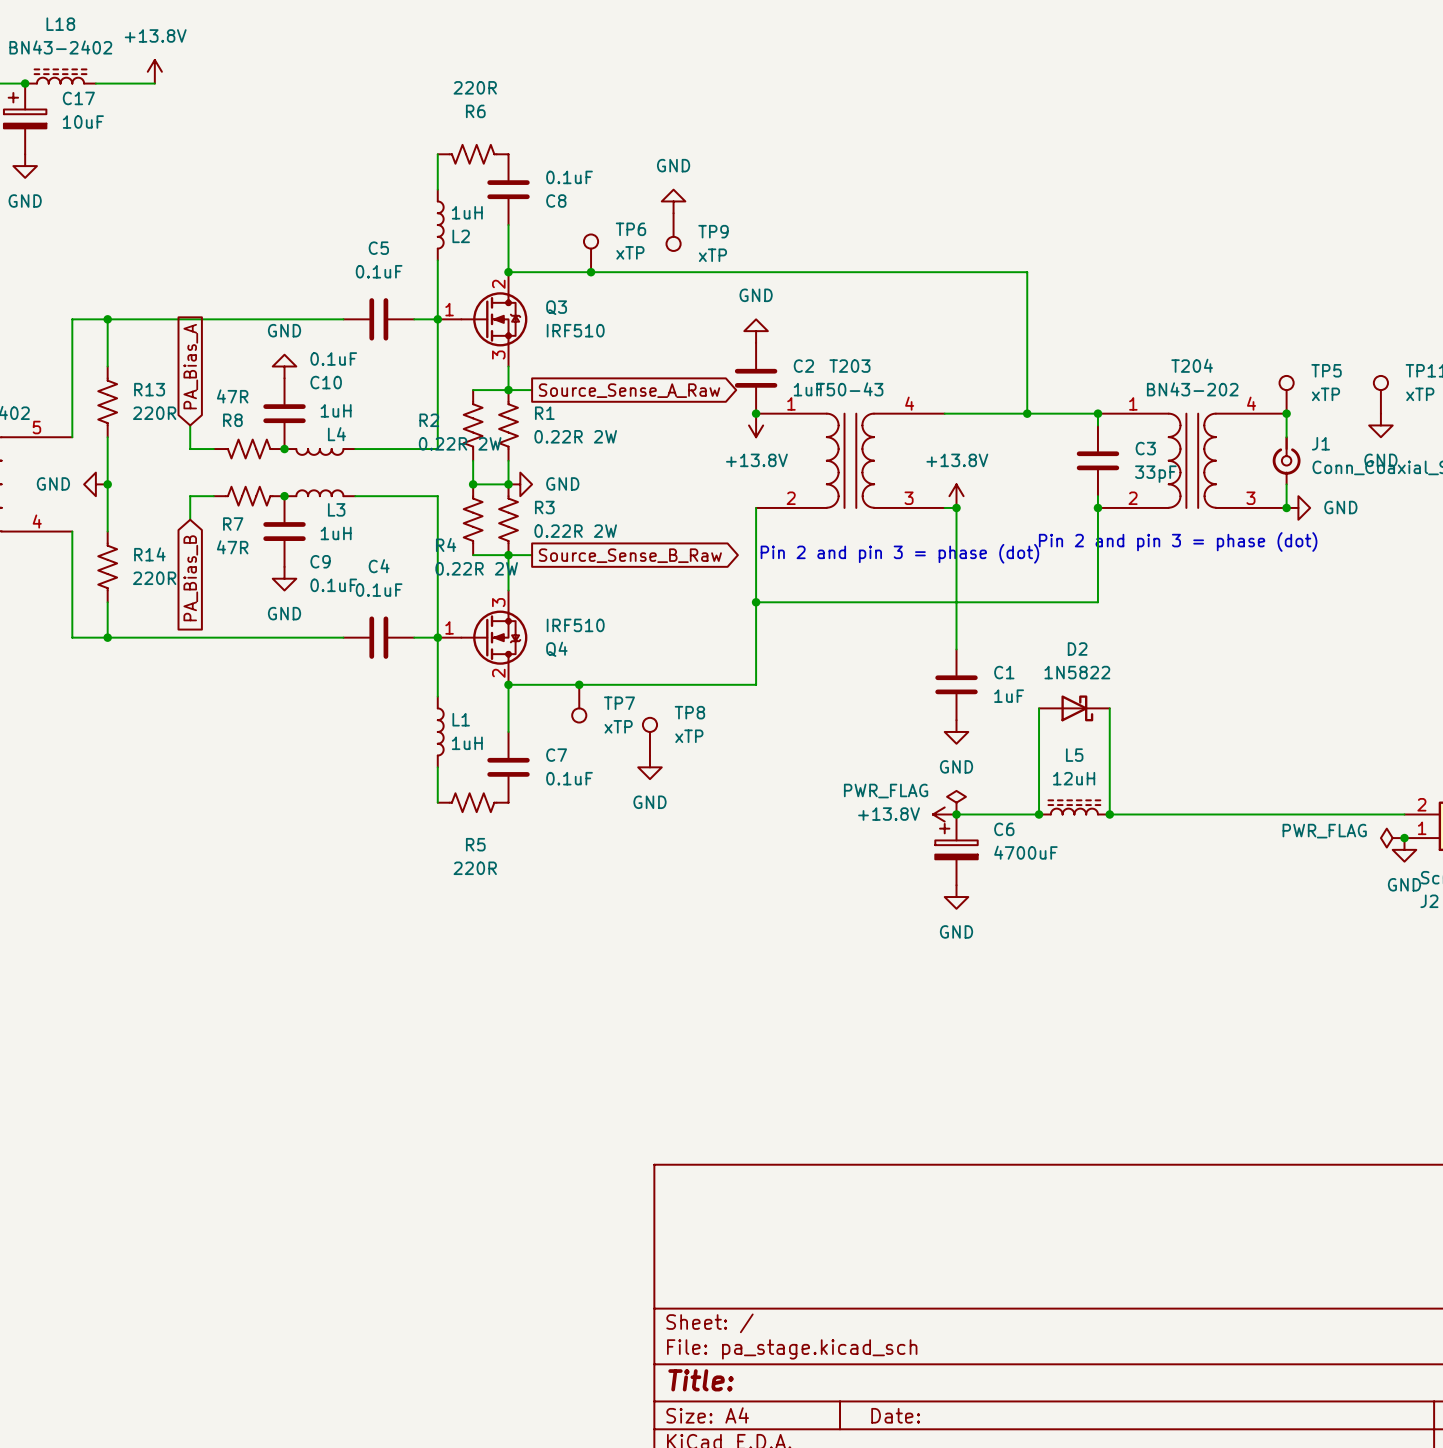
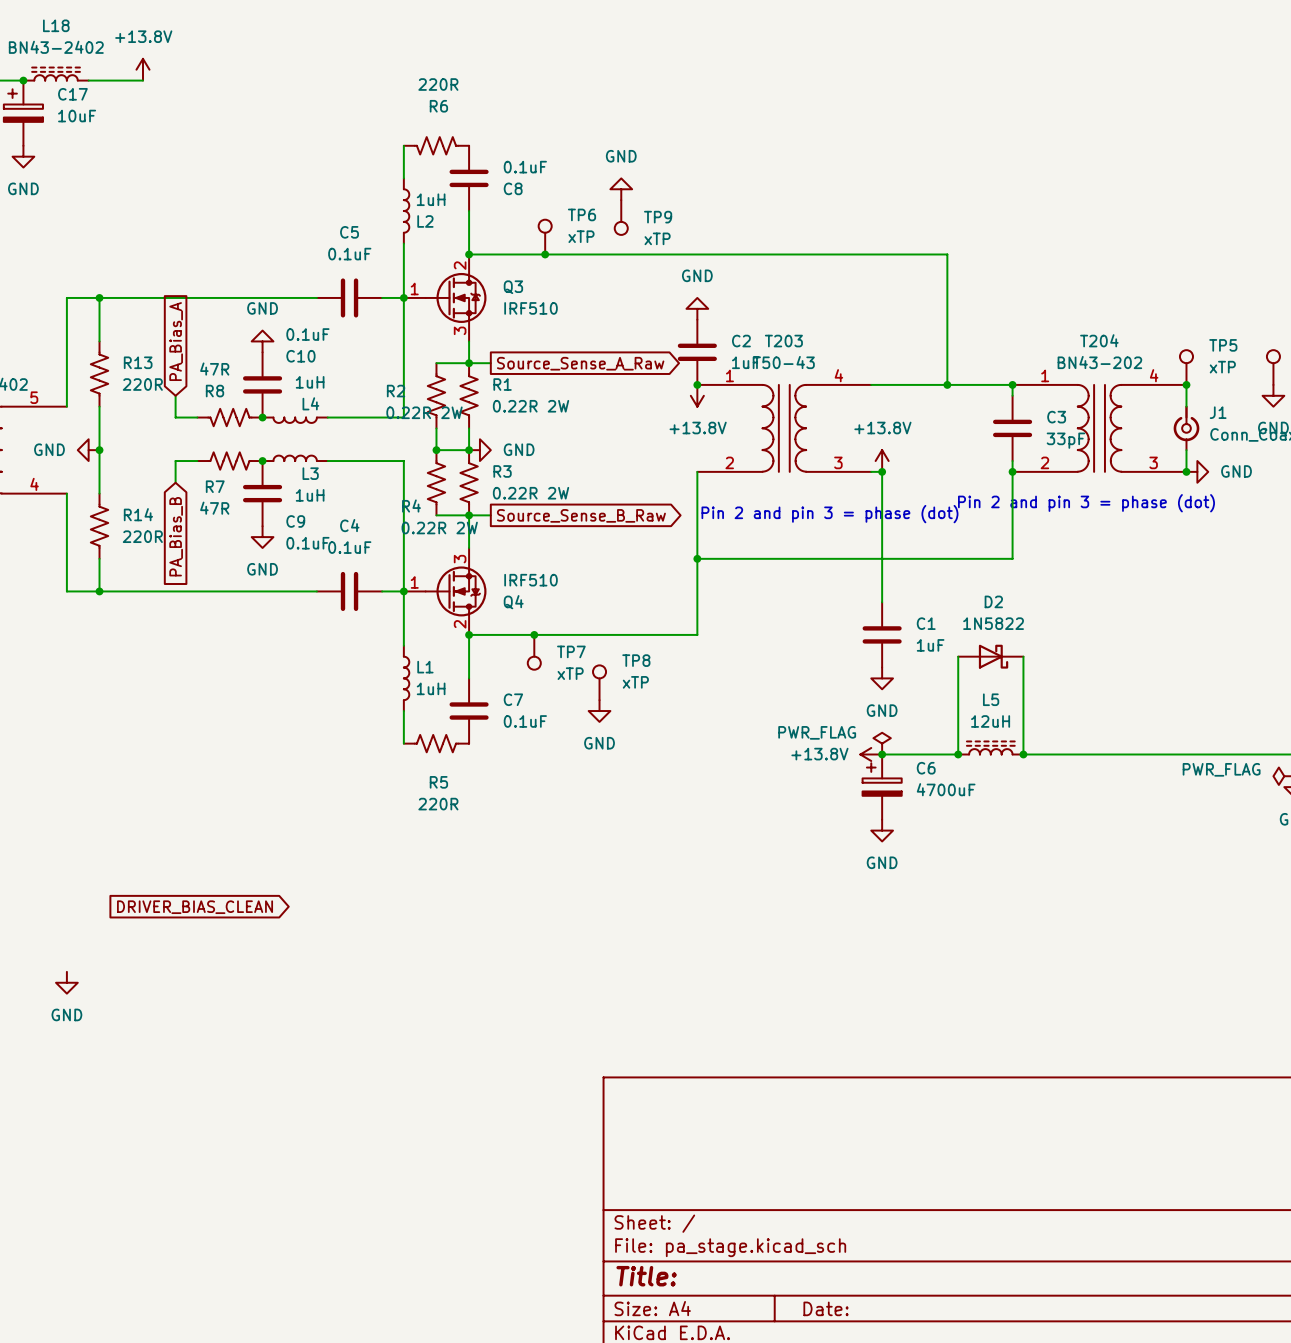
global label: none -> DRIVER_BIAS_CLEAN (195, 907)
power symbol: none -> GND (66, 982)

